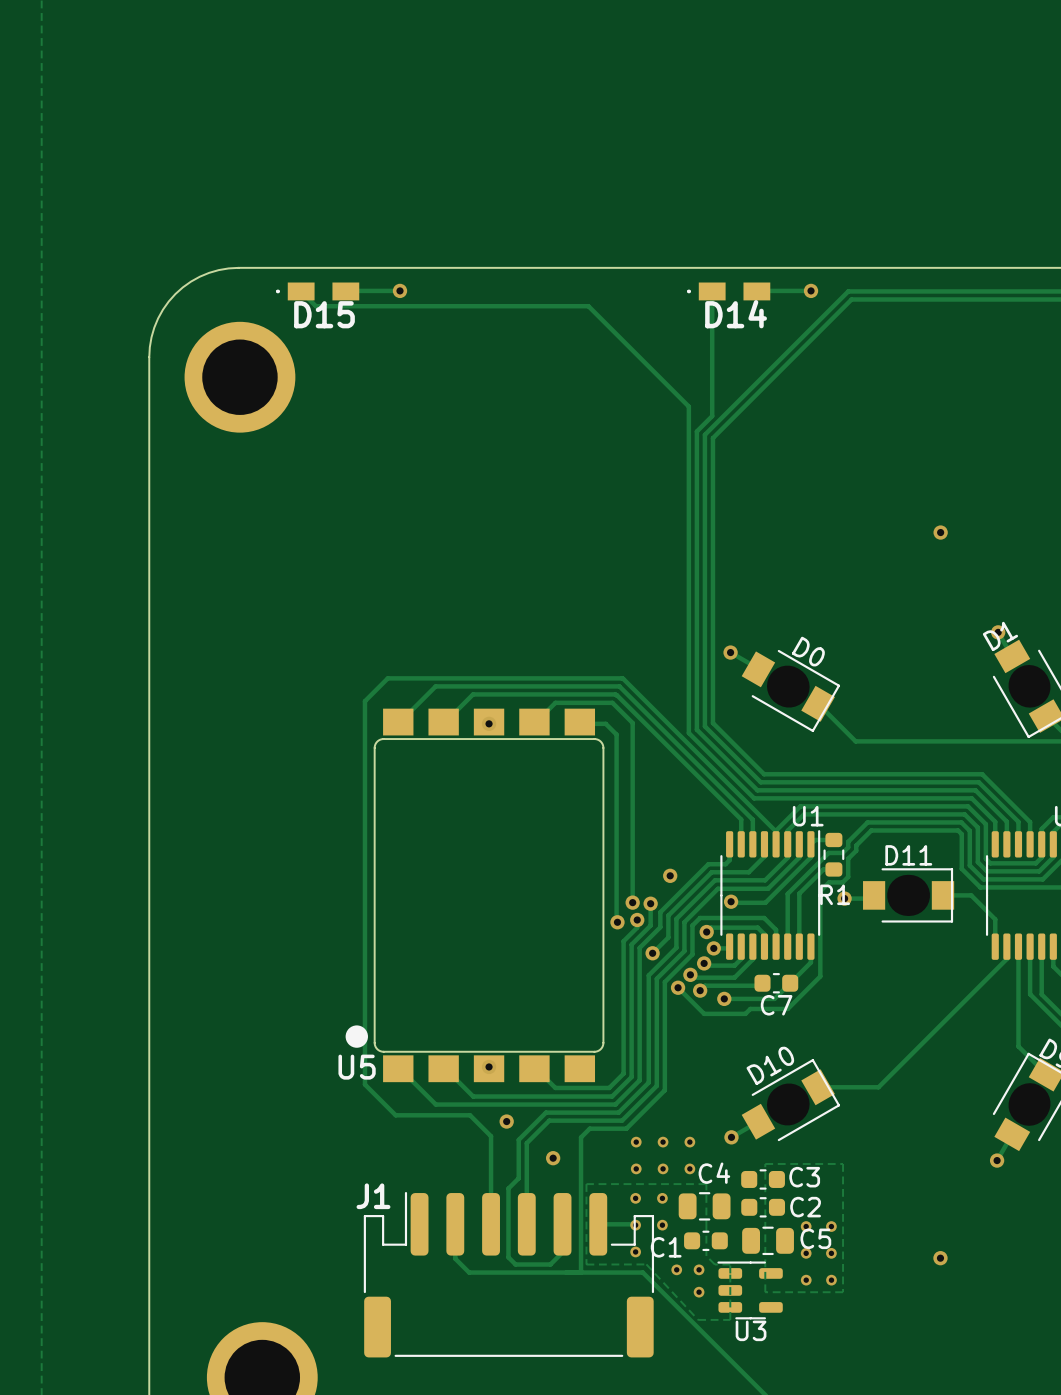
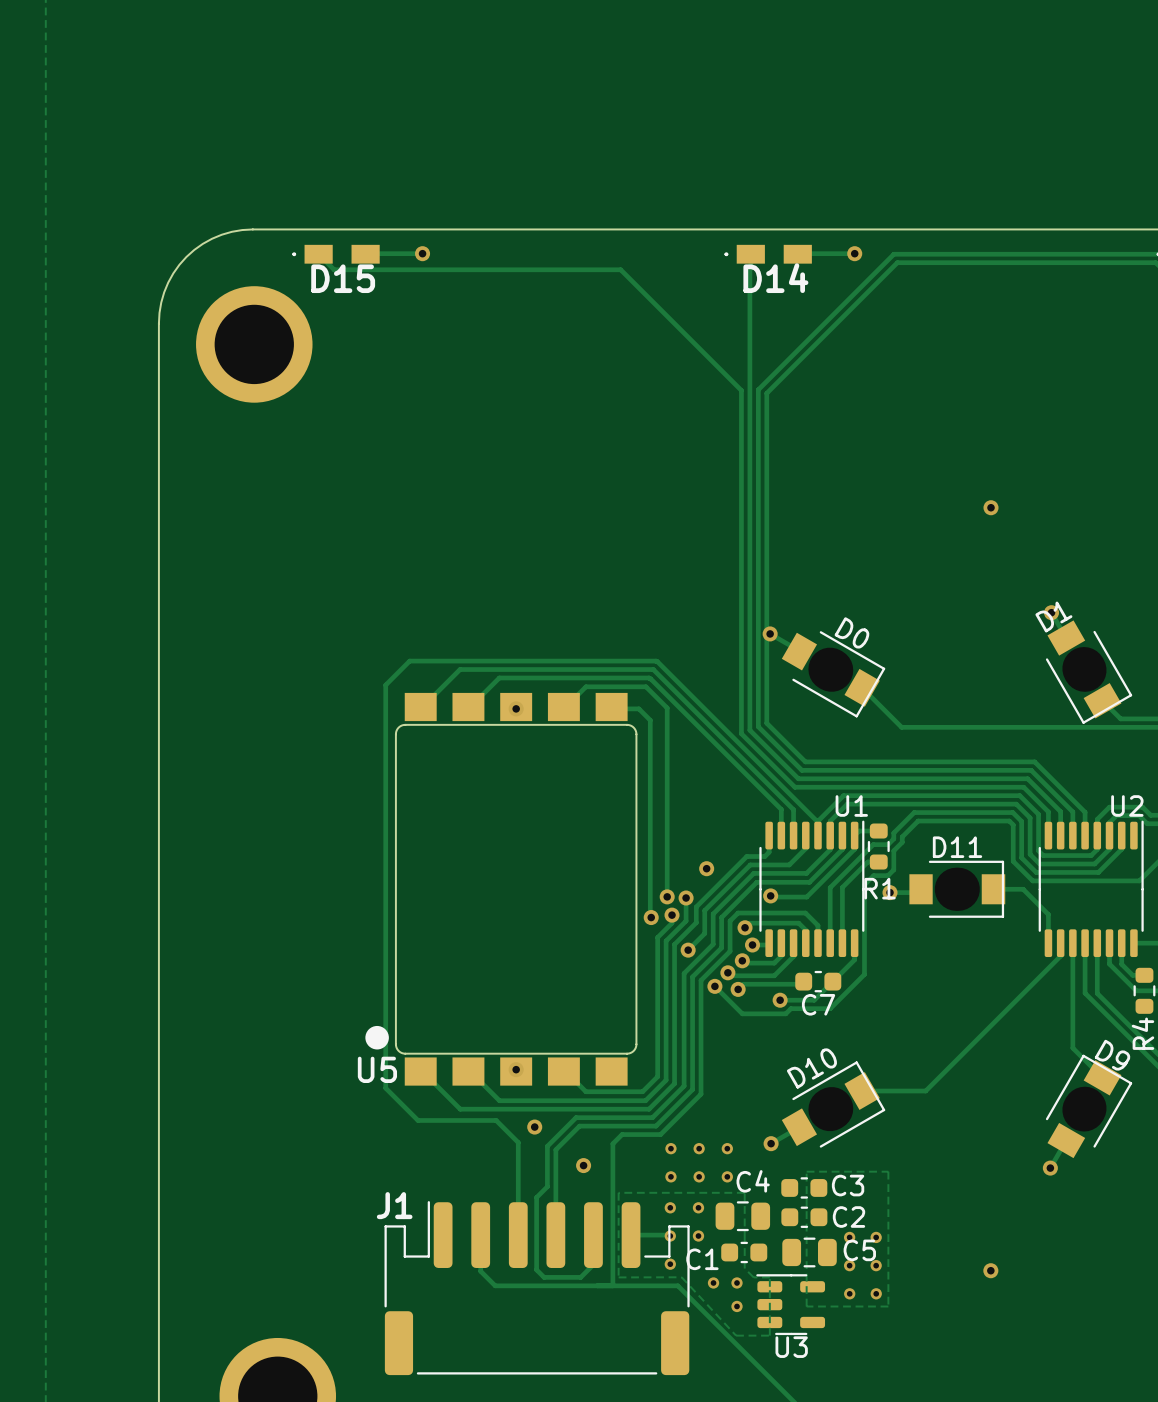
track: (712, 304) (712, 416) (696, 431) (696, 729) (711, 744) -> (750, 268) (749, 730)
track: (688, 406) (688, 733) (703, 747) -> (726, 375) (741, 390) (741, 733)
track: (719, 420) (704, 434) (704, 726) (719, 740) -> (758, 389) (758, 726)
track: (727, 423) (712, 438) (712, 723) (727, 737) -> (766, 393) (766, 723)
track: (724, 998) (774, 998) -> (780, 1000) (814, 1000) (816, 998)
via position: (724, 998) -> (780, 1000)

